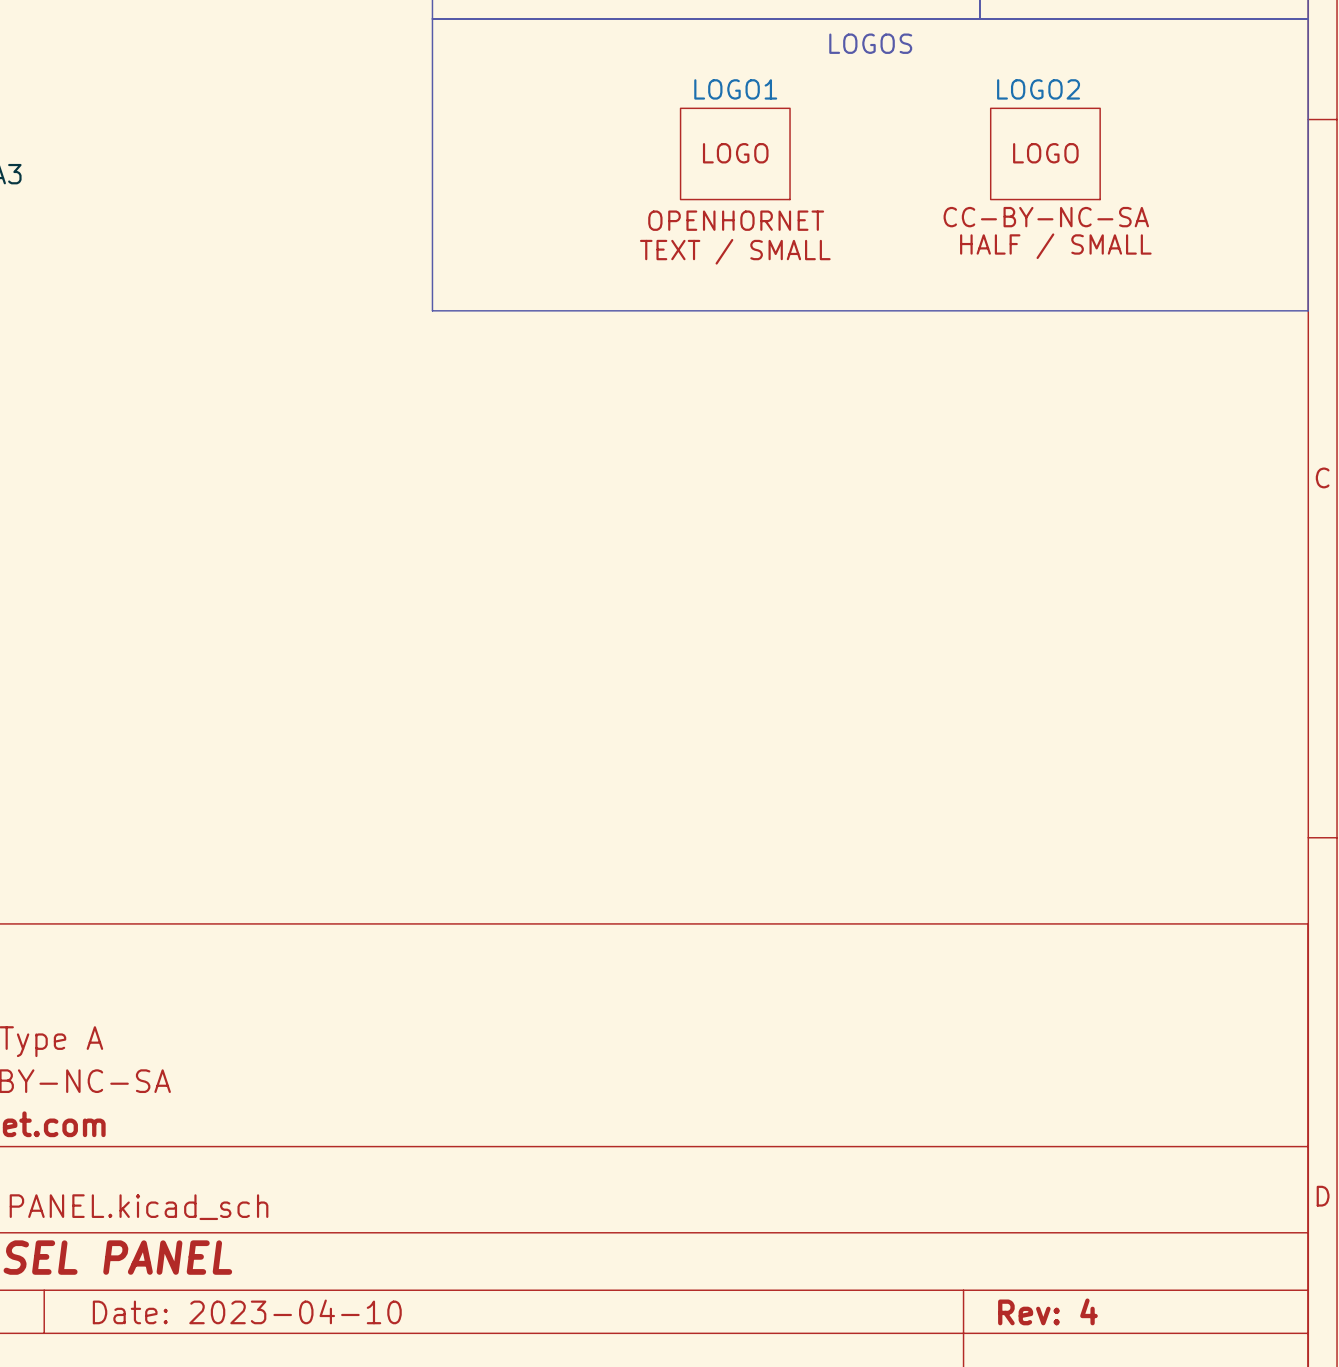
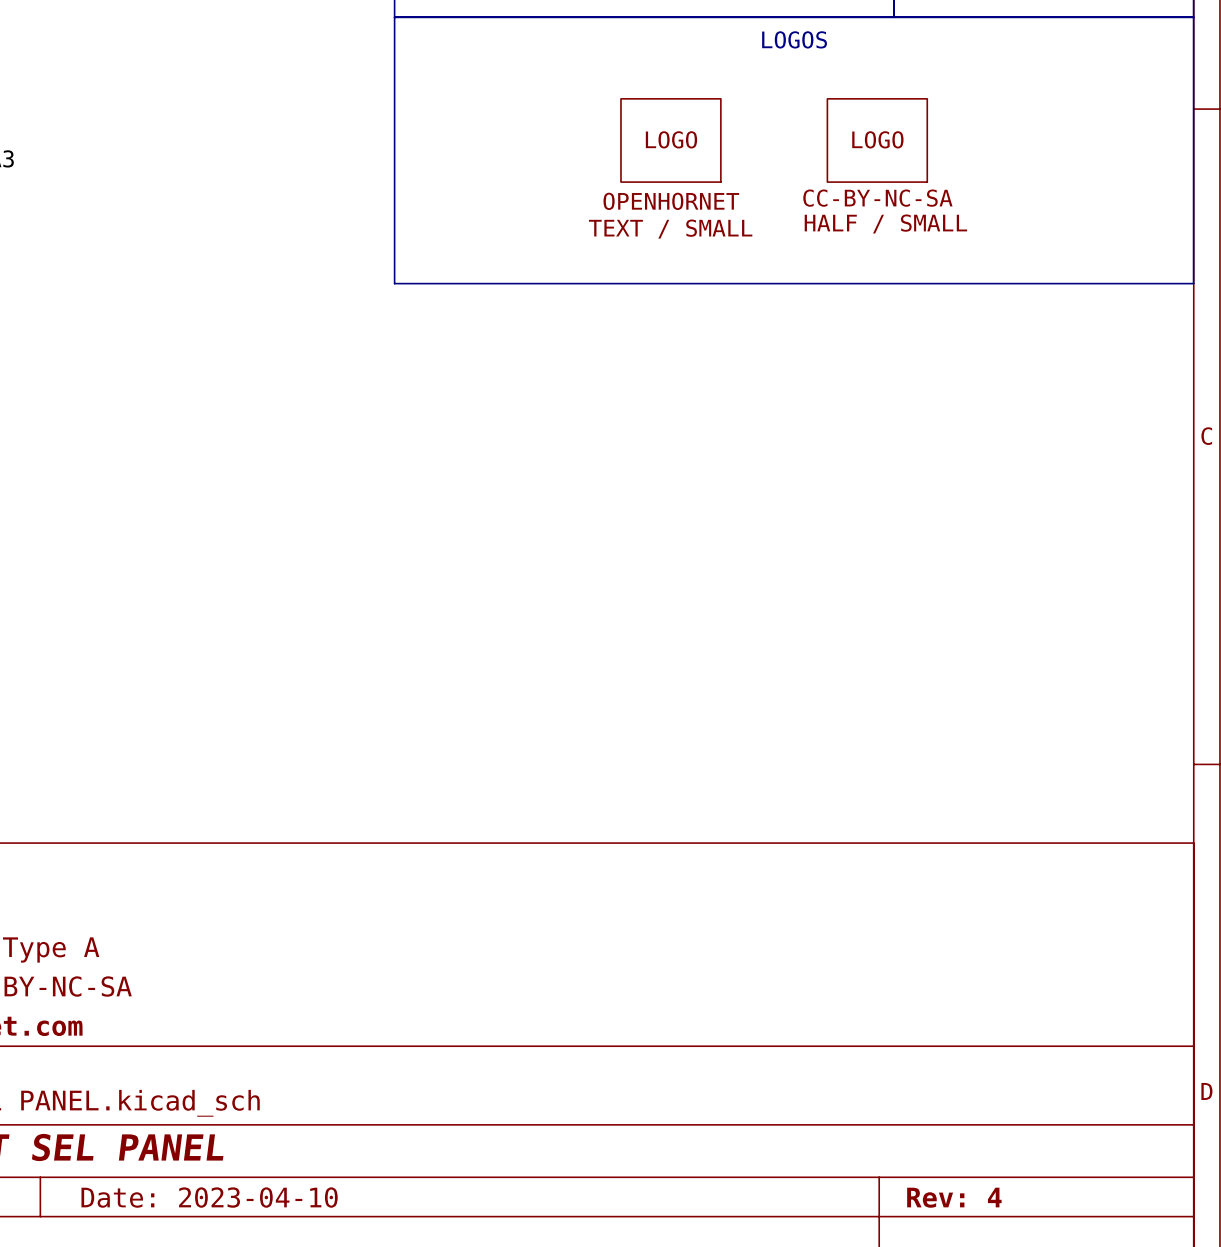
LOGO1 name: LOGO1 (735, 89) -> none
part: none -> (877, 140)
LOGO2: (1045, 153) -> none

